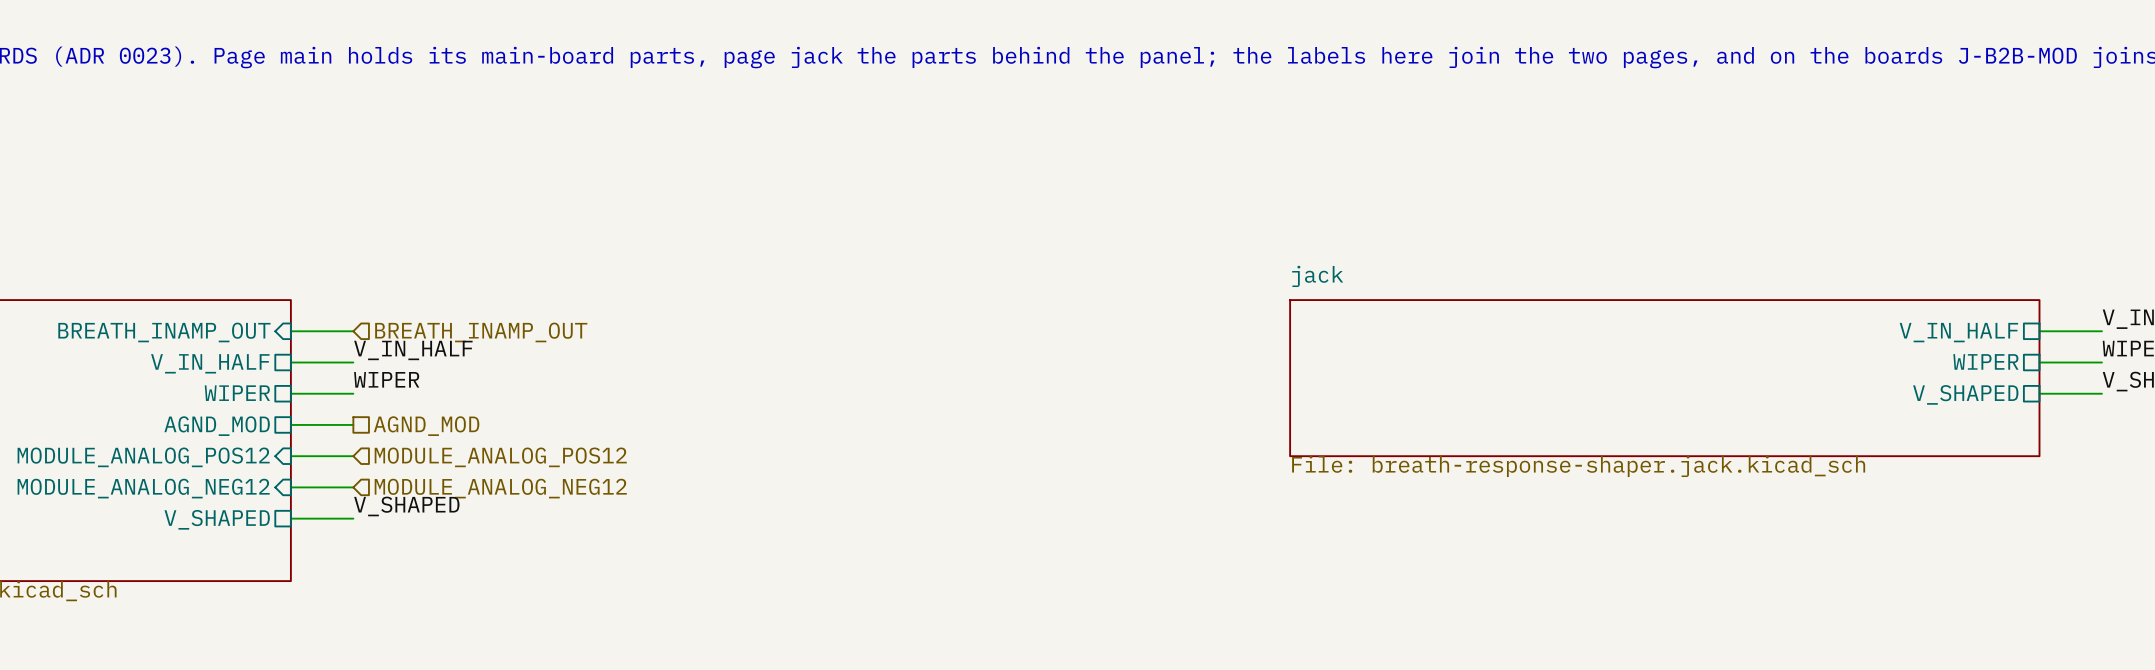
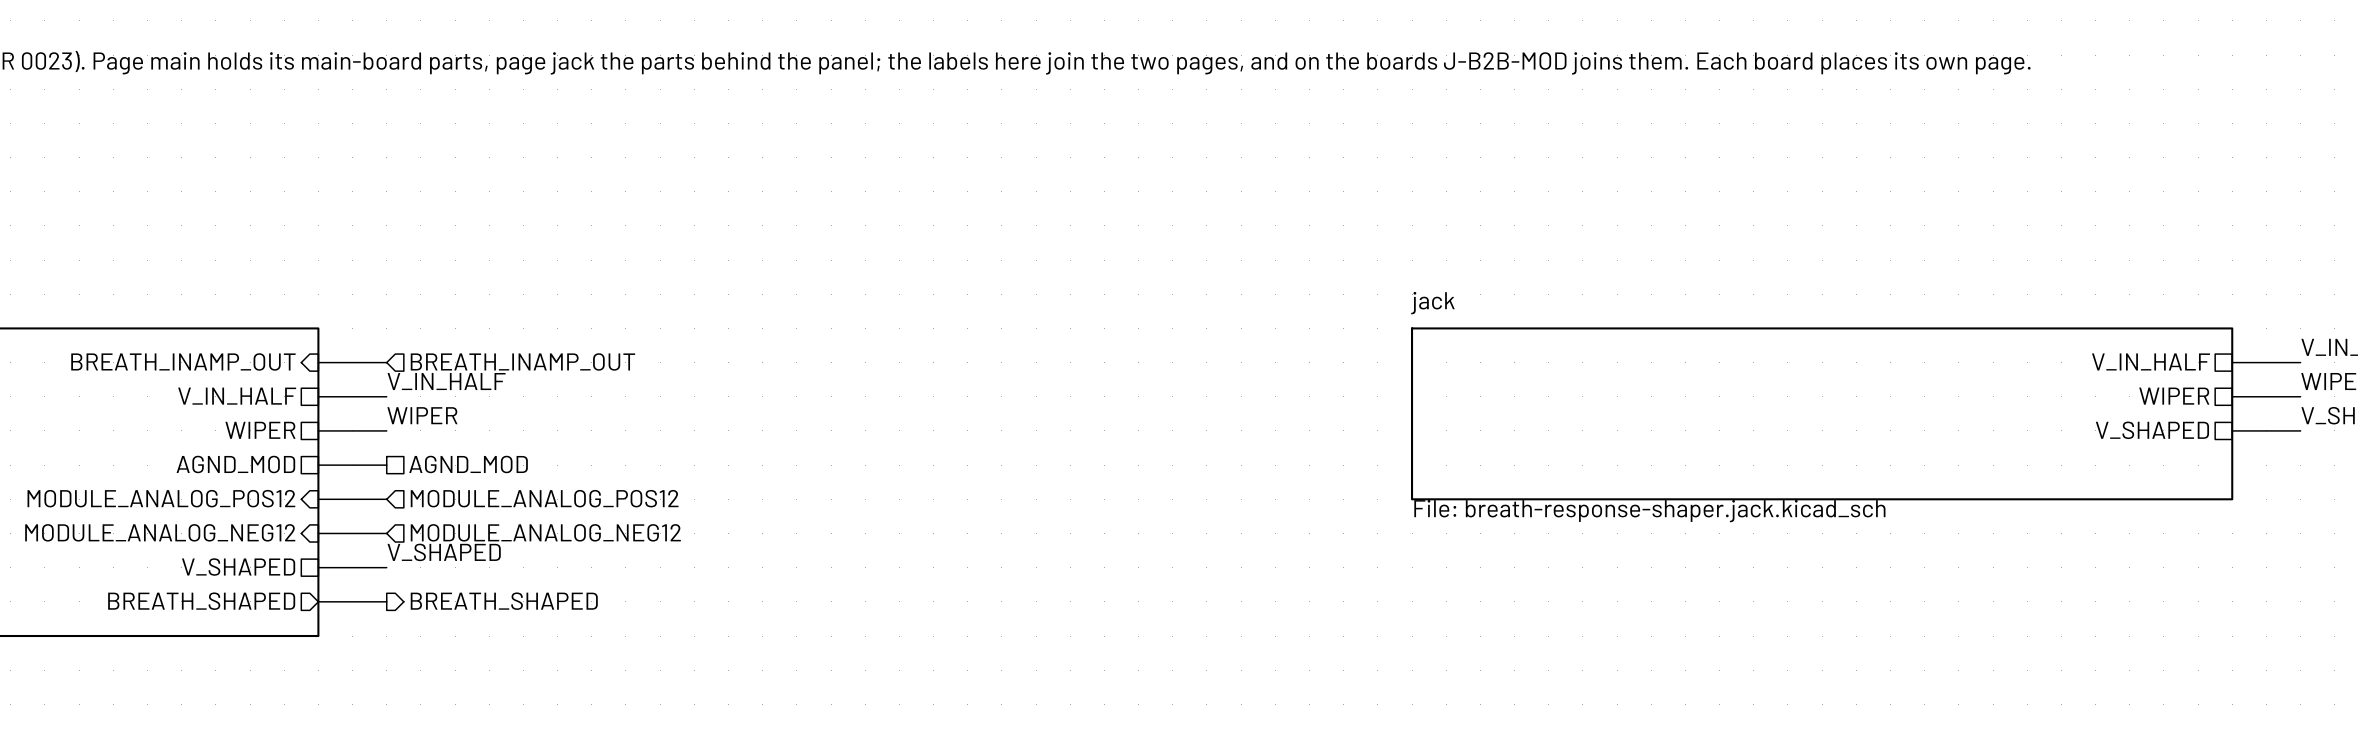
wire: none -> (318, 601) (386, 601)
sheet pin: none -> BREATH_SHAPED (201, 601)
hierarchical label: none -> BREATH_SHAPED (504, 601)

